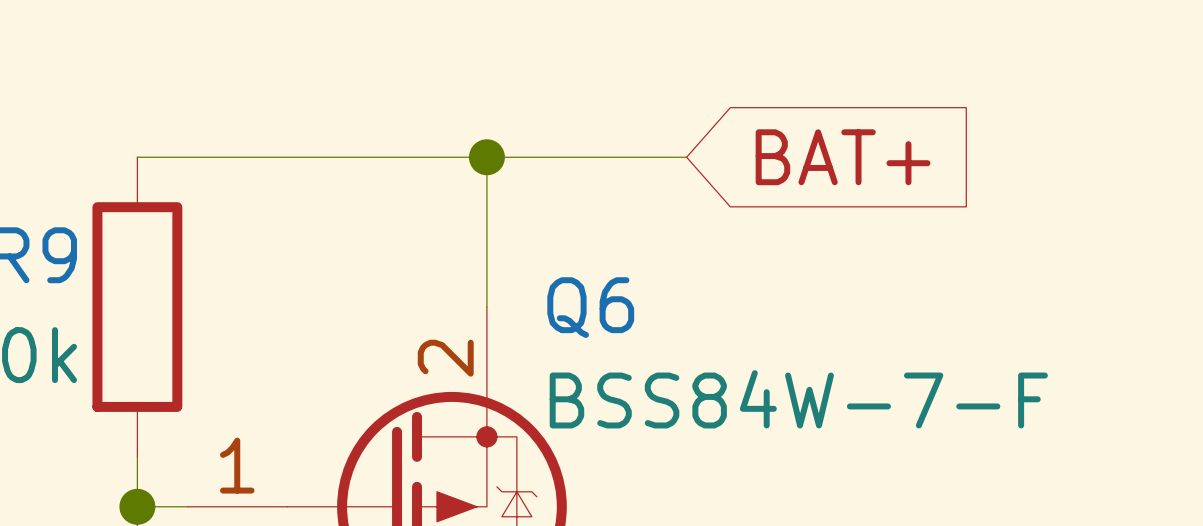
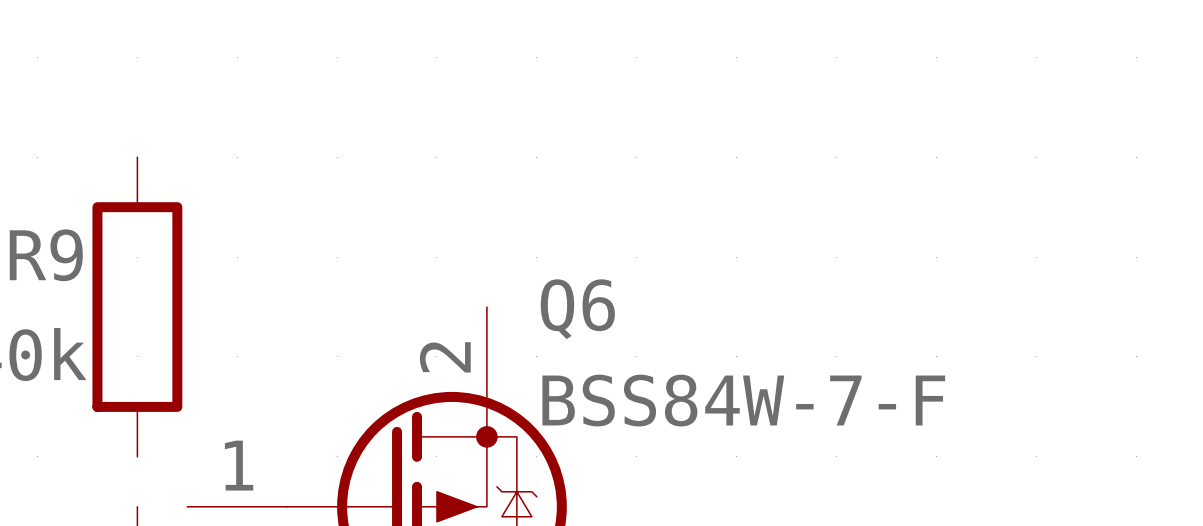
wire: (137, 157) (686, 157) -> none
wire: (486, 157) (486, 307) -> none
junction: (486, 157) -> none
global label: BAT+ (843, 157) -> none
wire: (137, 456) (137, 506) (187, 506) -> none
junction: (137, 506) -> none

